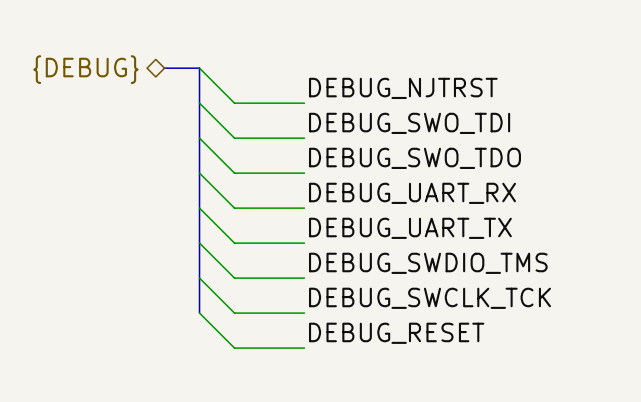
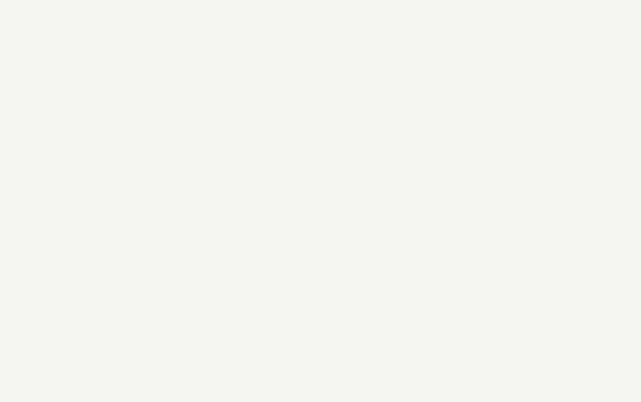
bus: (164, 68) (199, 68) (199, 313) -> none
wire: (199, 68) (234, 103) (304, 103) -> none
hierarchical label: {DEBUG} (85, 69) -> none
label: DEBUG_NJTRST (403, 88) -> none
wire: (199, 103) (234, 138) (304, 138) -> none
label: DEBUG_SWO_TDI (409, 123) -> none
wire: (199, 138) (234, 173) (304, 173) -> none
label: DEBUG_SWO_TDO (414, 158) -> none
wire: (199, 173) (234, 208) (304, 208) -> none
label: DEBUG_UART_RX (412, 193) -> none
wire: (199, 208) (234, 243) (304, 243) -> none
label: DEBUG_UART_TX (410, 228) -> none
wire: (199, 243) (234, 278) (304, 278) -> none
label: DEBUG_SWDIO_TMS (428, 263) -> none
wire: (199, 278) (234, 313) (304, 313) -> none
label: DEBUG_SWCLK_TCK (429, 298) -> none
wire: (199, 313) (234, 348) (304, 348) -> none
label: DEBUG_RESET (396, 333) -> none

